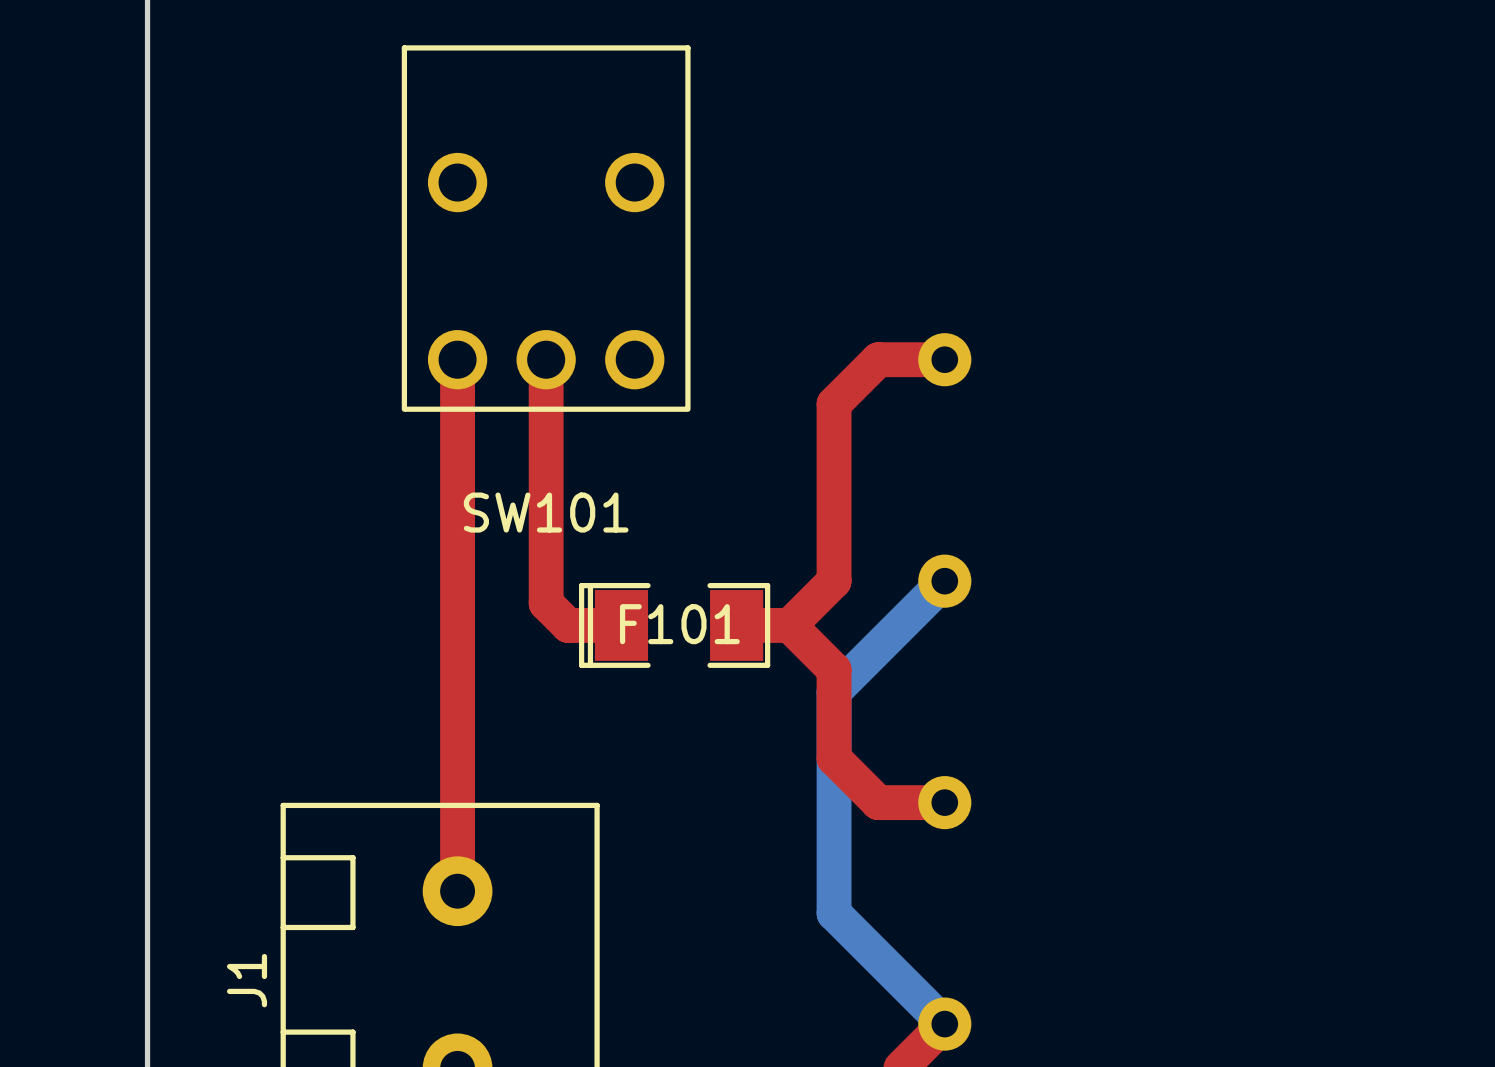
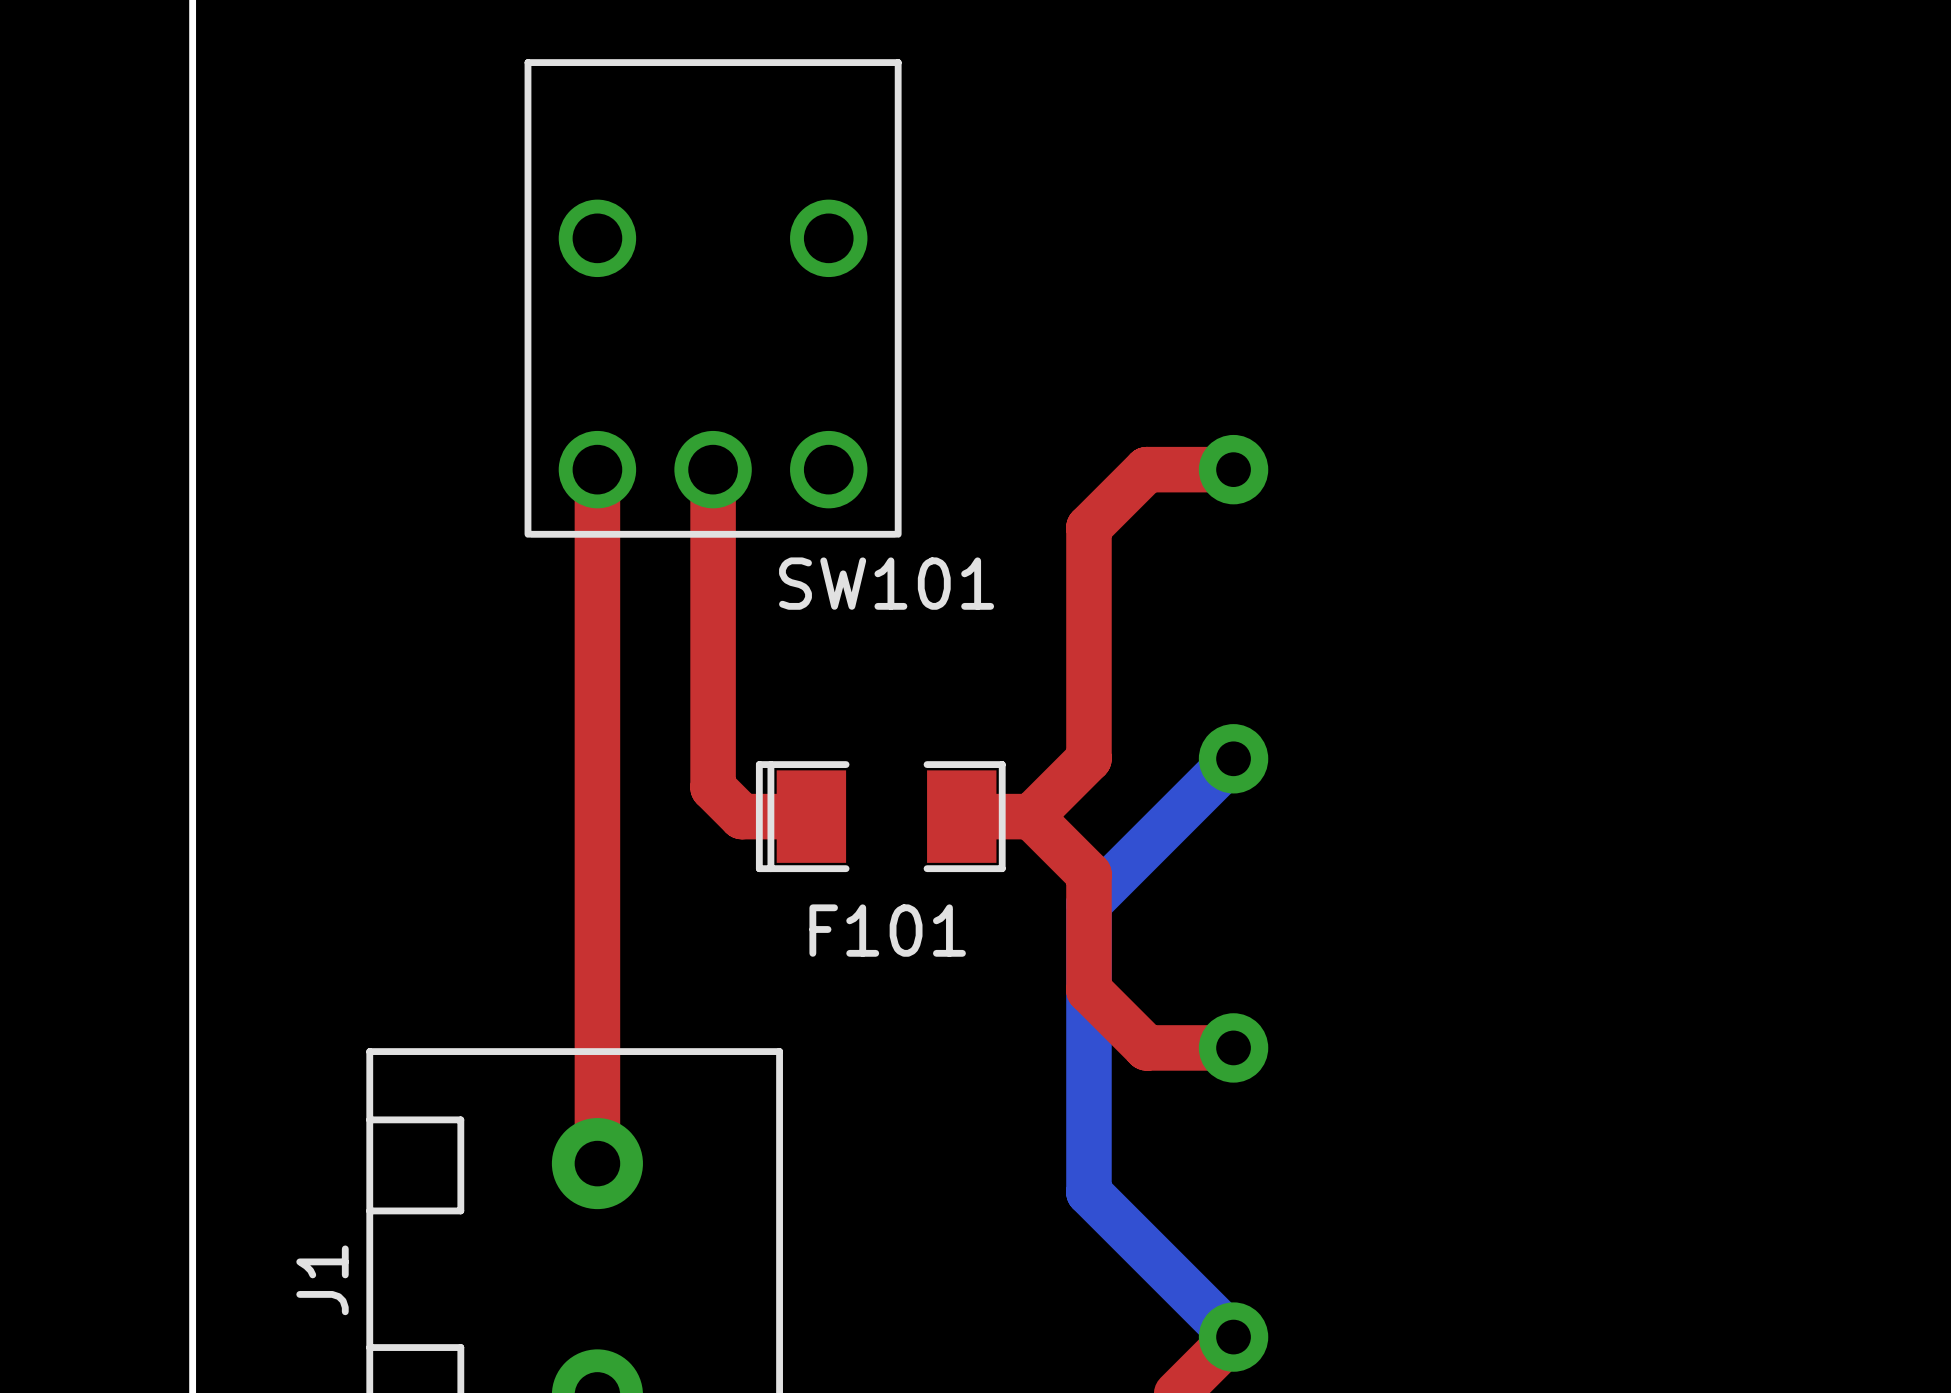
SW101 name position: SW101 (546, 512) -> SW101 (886, 583)
F101 name position: F101 (679, 624) -> F101 (887, 930)

